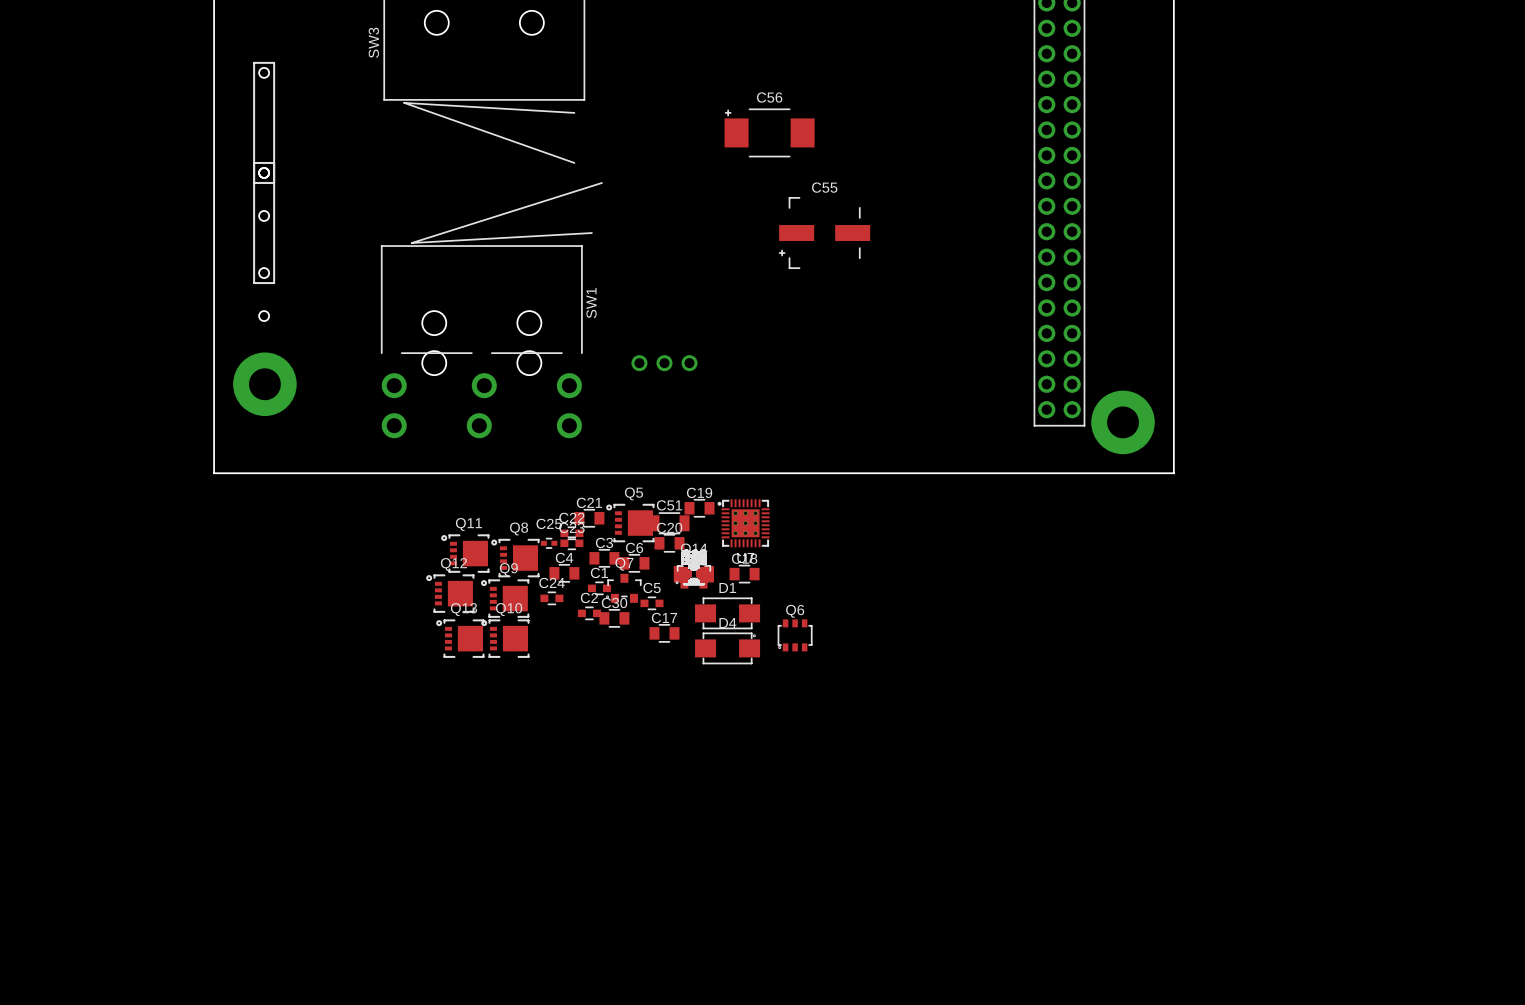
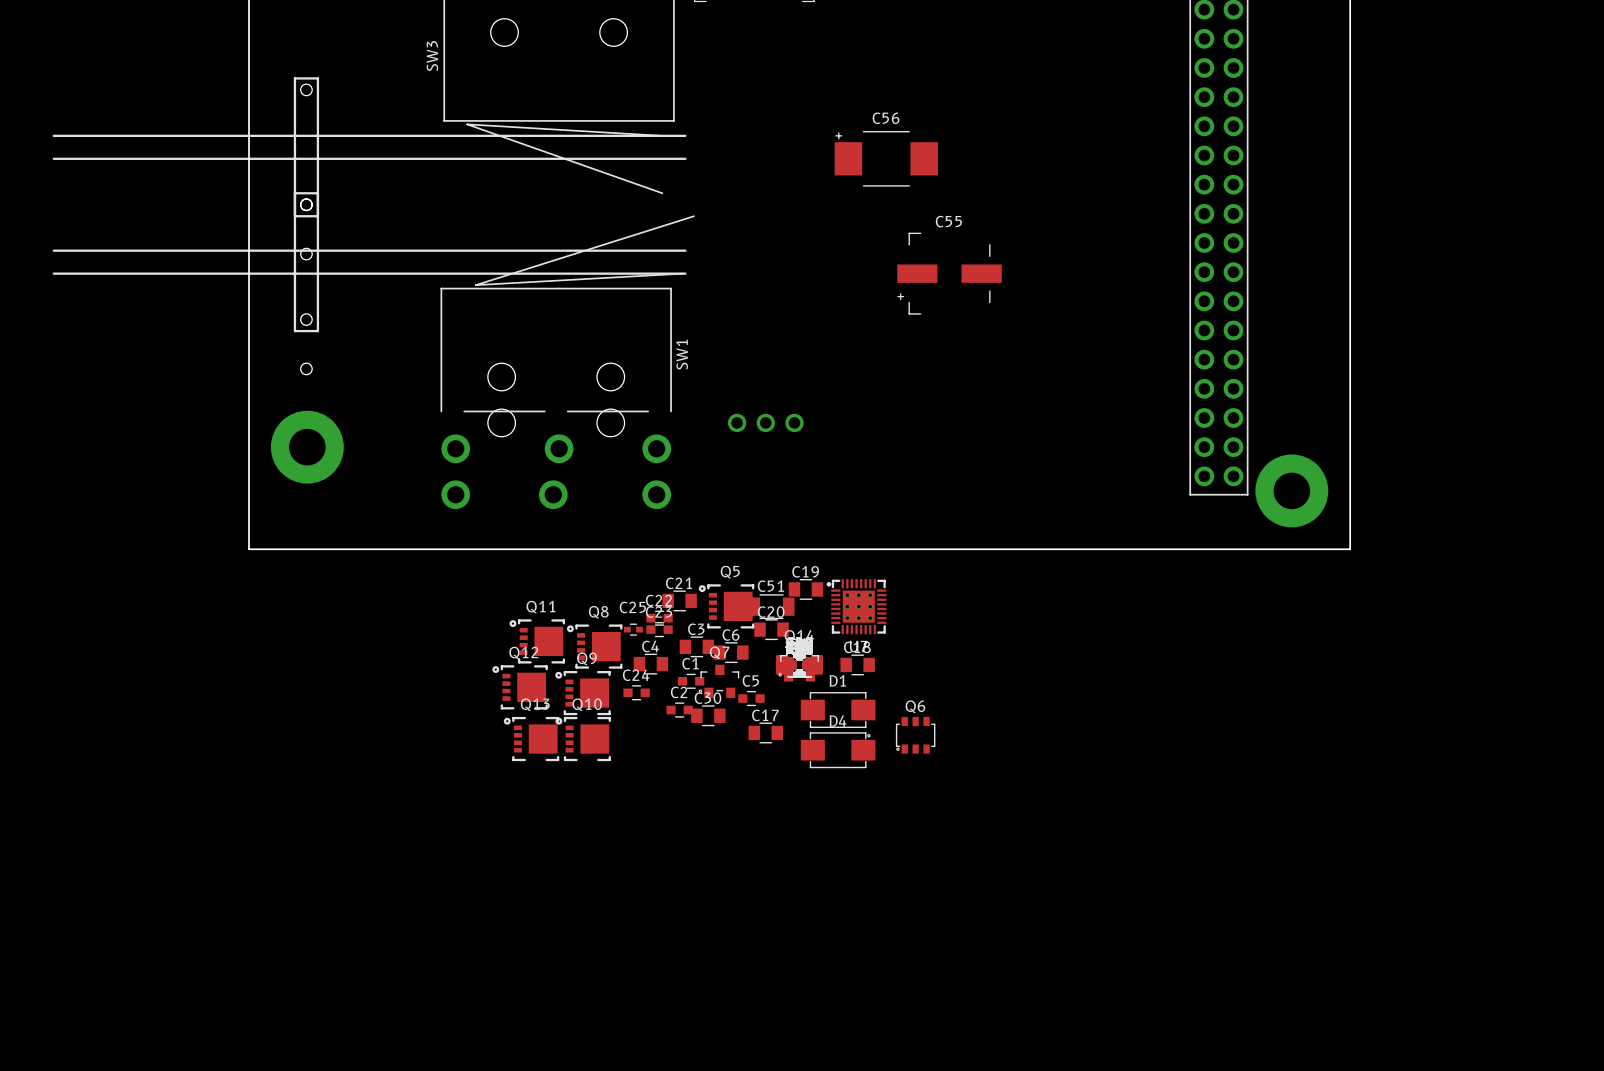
line: none -> (53, 135) (685, 135)
line: none -> (53, 158) (685, 158)
line: none -> (53, 250) (685, 250)
line: none -> (53, 273) (685, 273)

